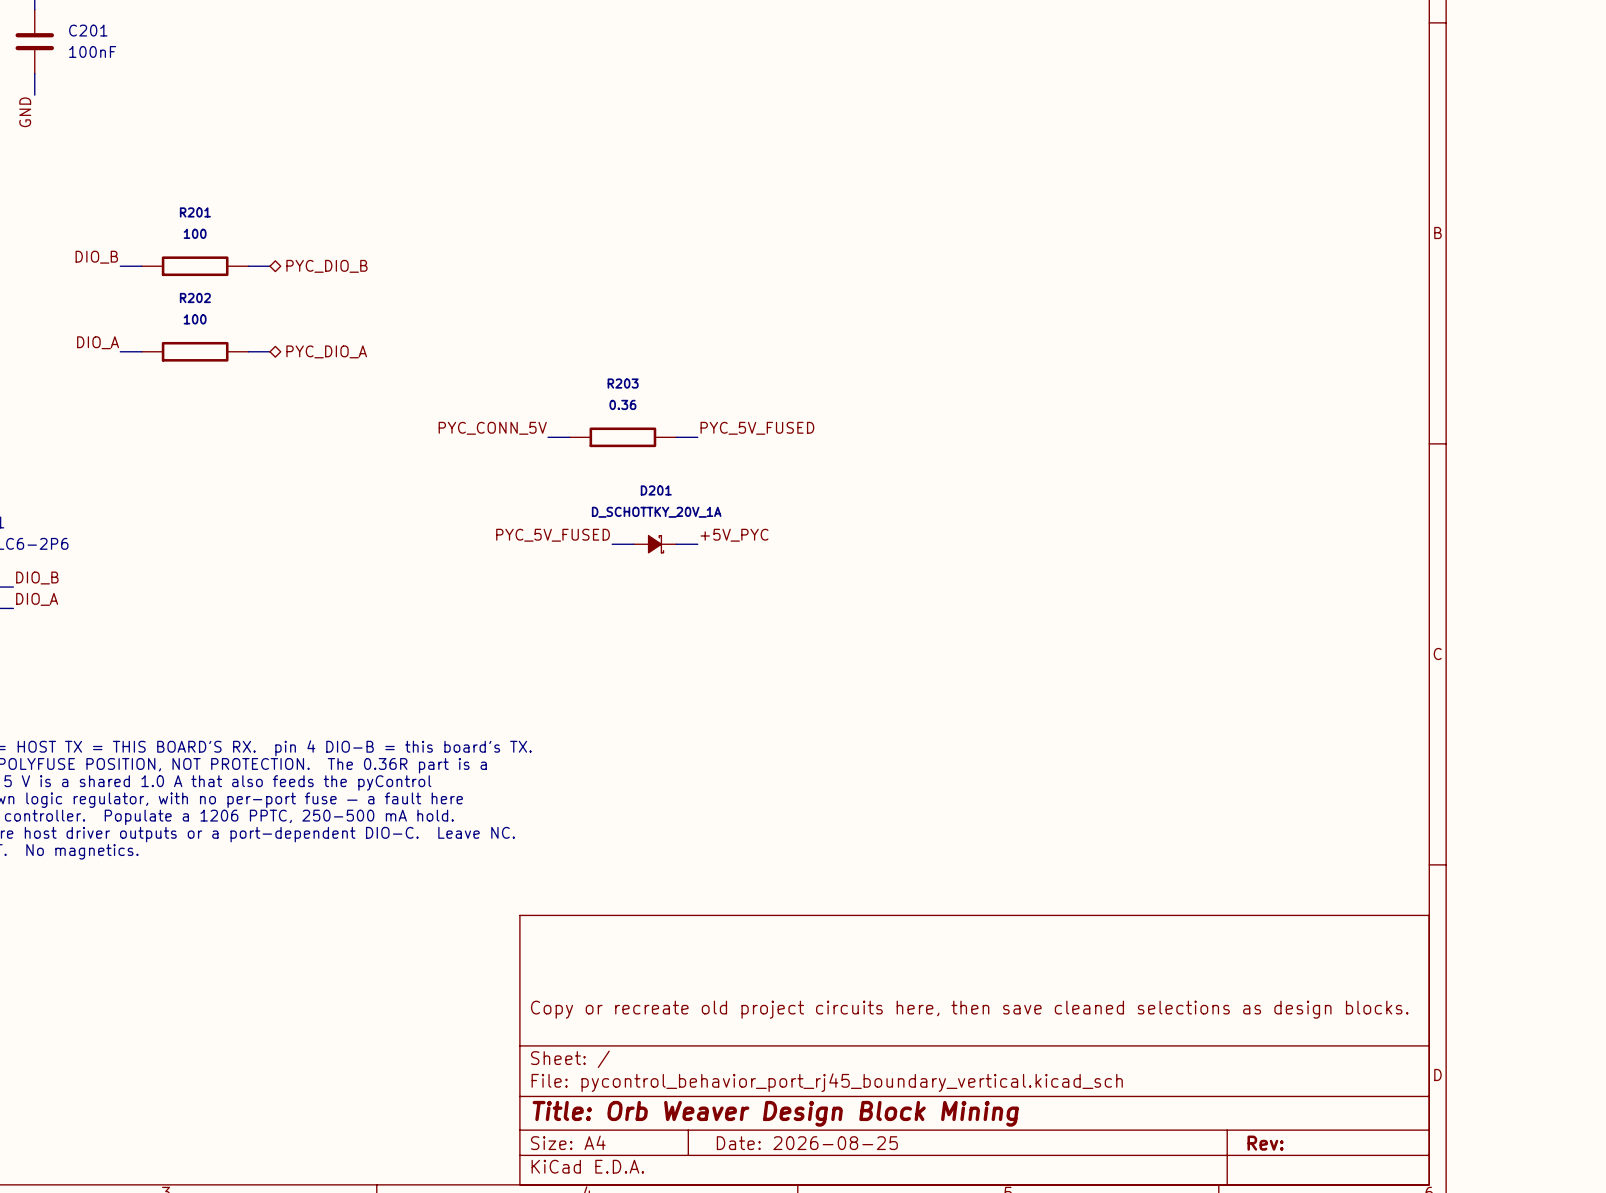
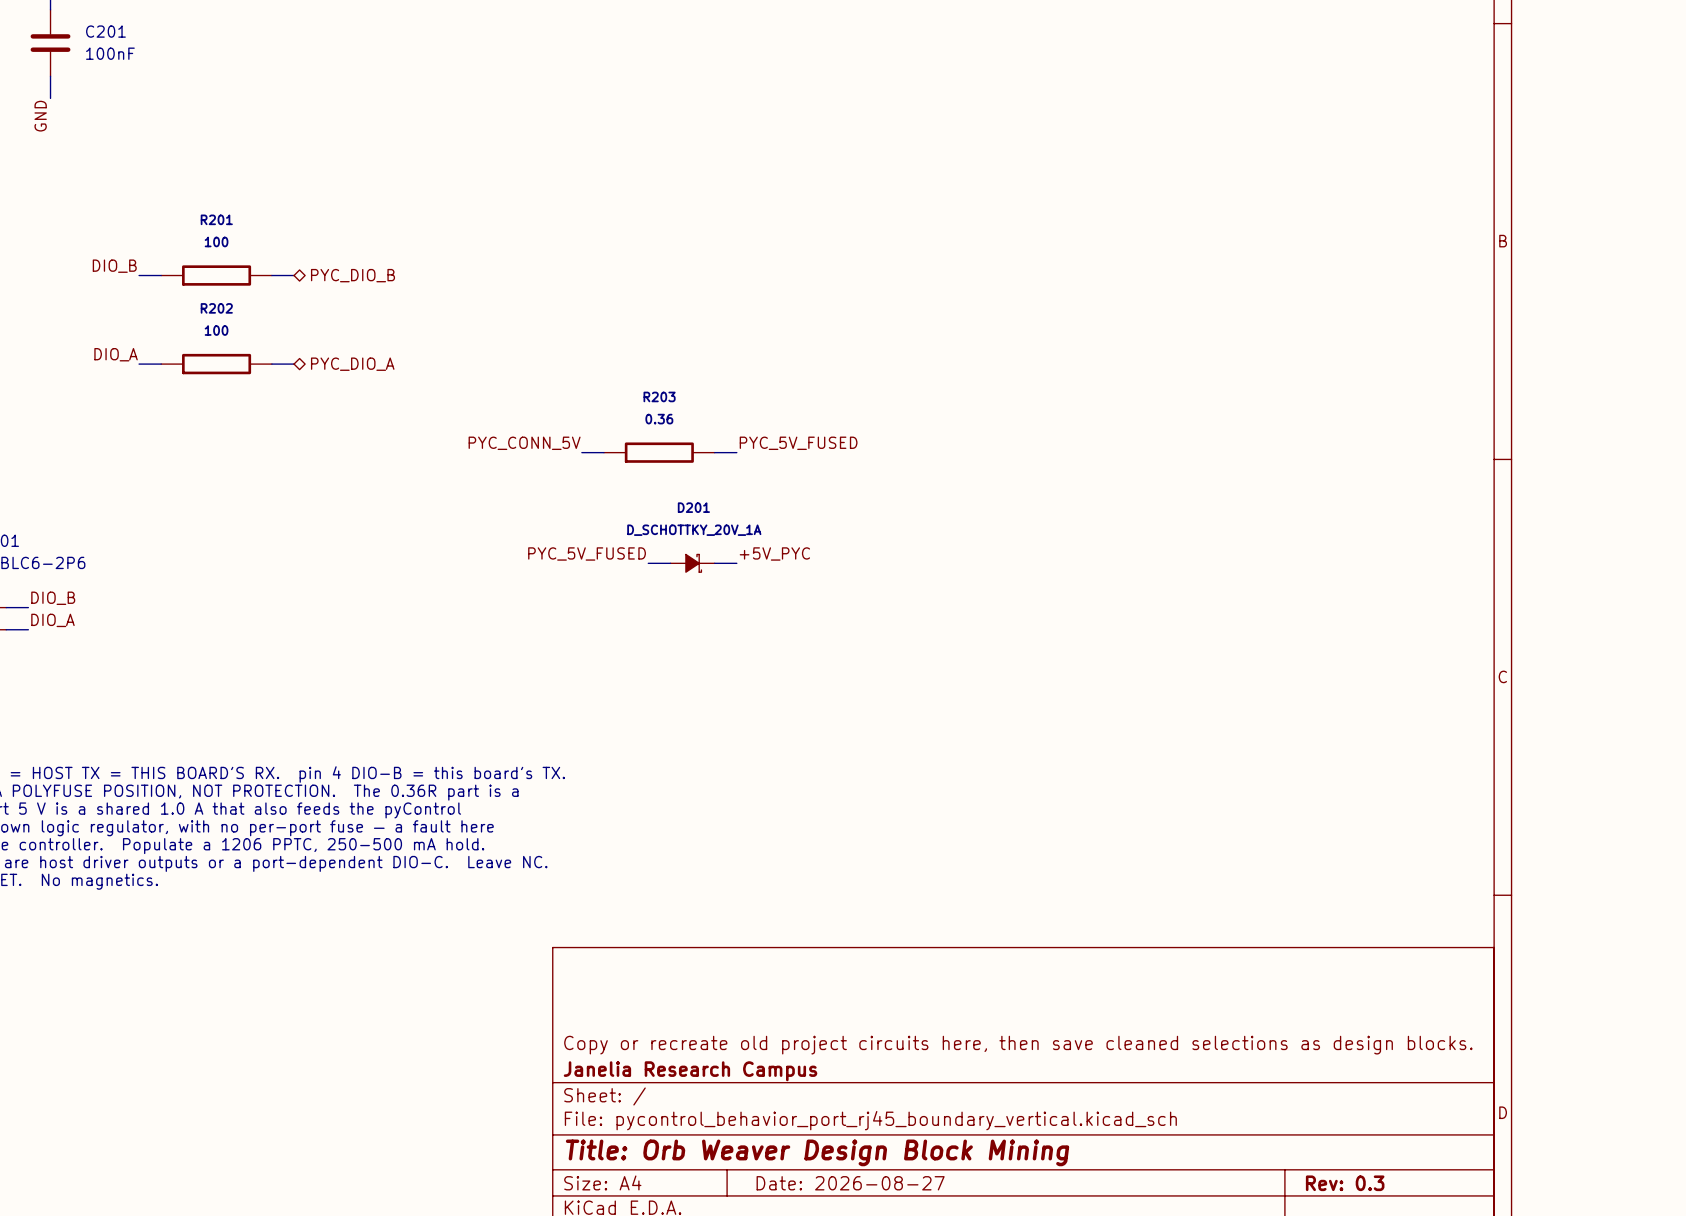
title block: none -> Janelia Research Campus (690, 1071)
title block: Date: 2026-08-25 (807, 1143) -> Date: 2026-08-27 (850, 1183)
title block: Rev: (1265, 1143) -> Rev: 0.3 (1345, 1183)

